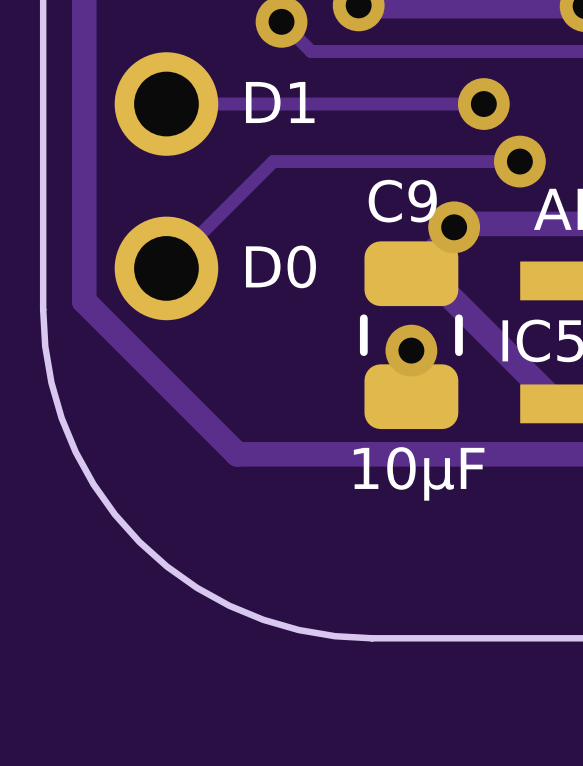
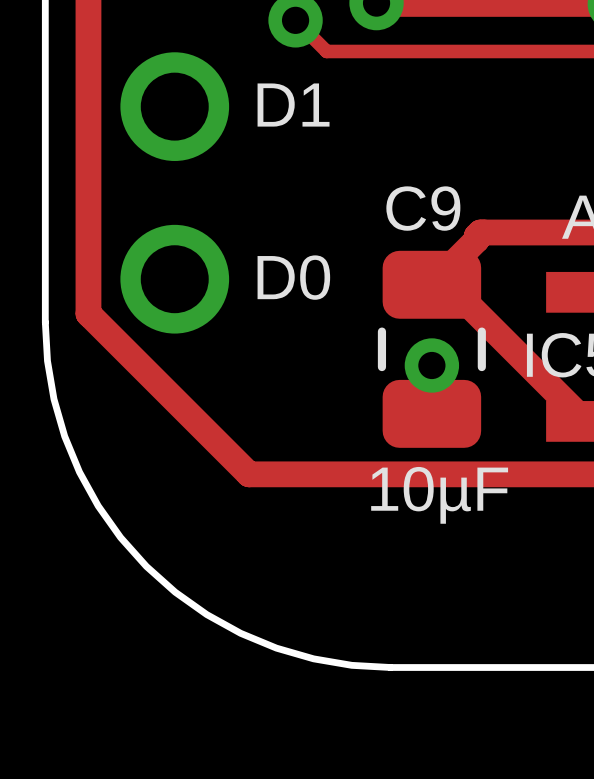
track: (166, 104) (483, 104) -> none
via: (483, 104) -> none
track: (519, 161) (273, 161) (166, 268) -> none
via: (519, 161) -> none
via: (454, 227) -> none

